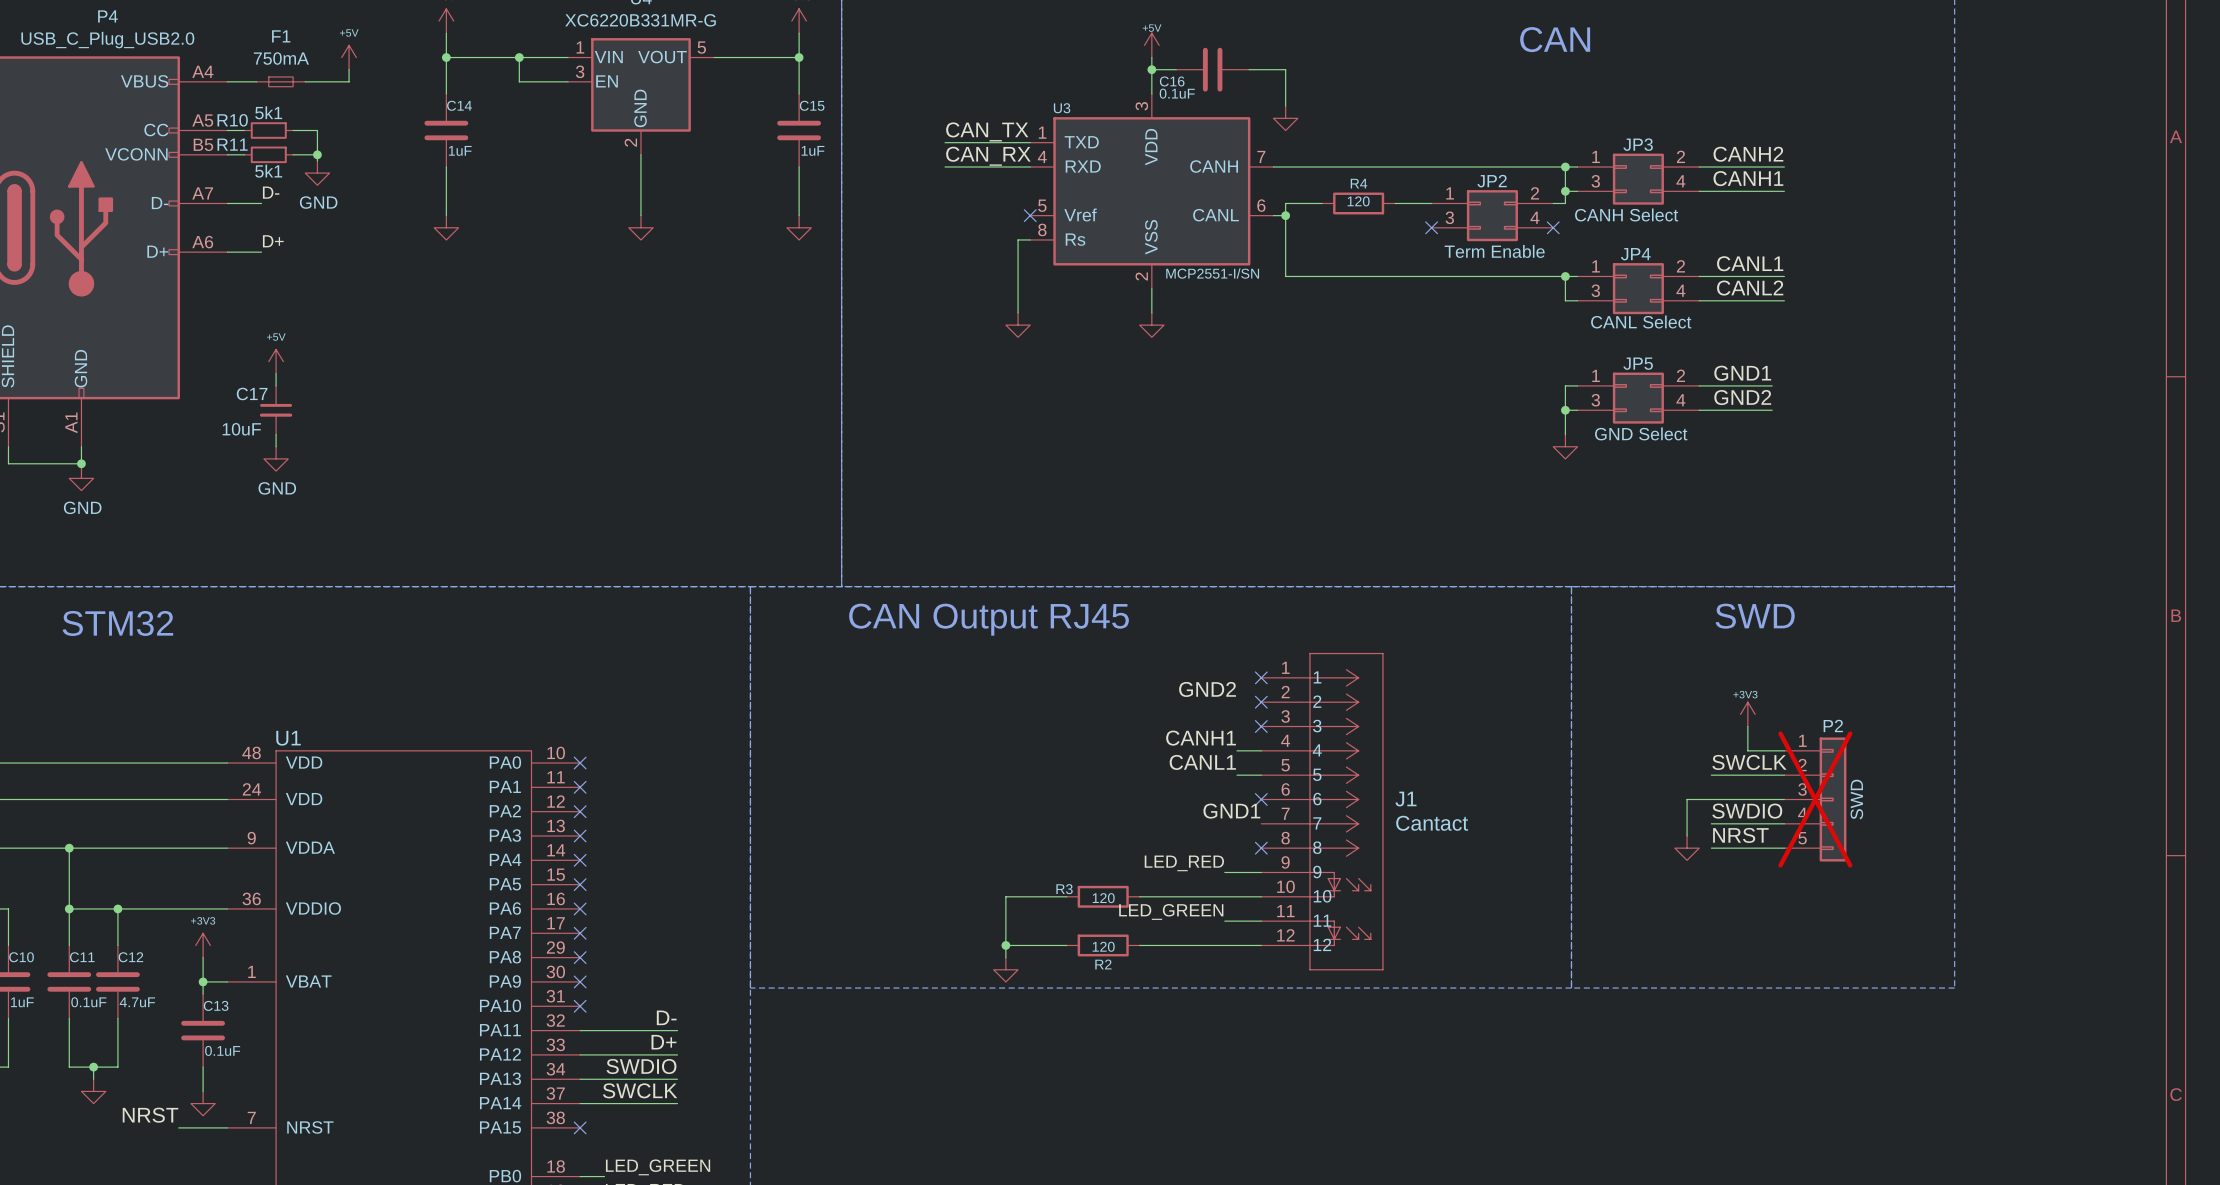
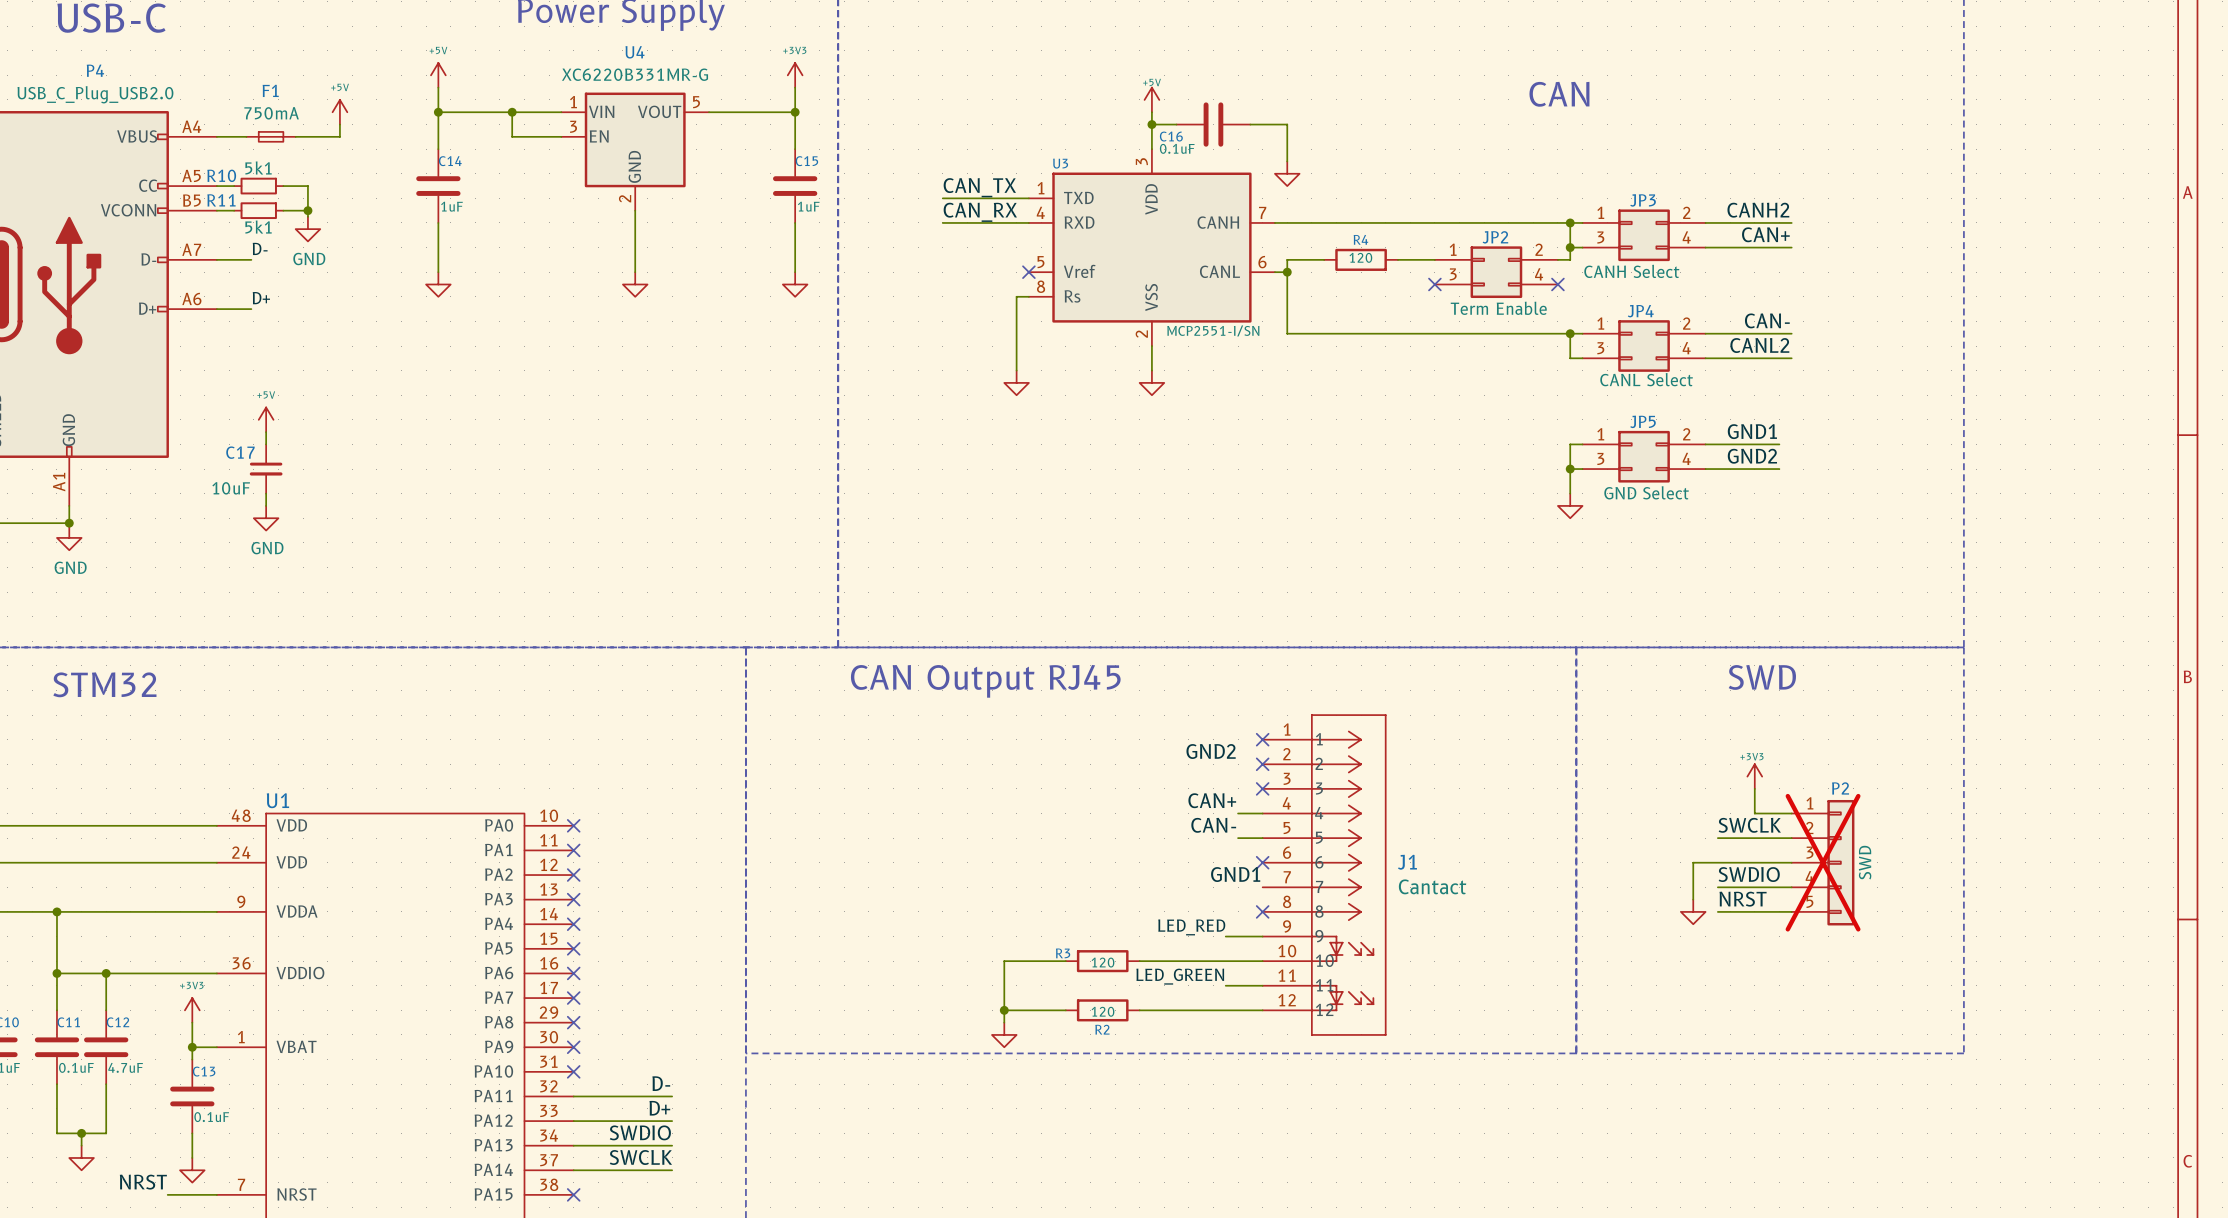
label: CANH1 (1748, 178) -> CAN+ (1765, 234)
label: CANL1 (1750, 263) -> CAN- (1767, 320)
label: CANH1 (1201, 738) -> CAN+ (1212, 800)
label: CANL1 (1202, 762) -> CAN- (1213, 825)

